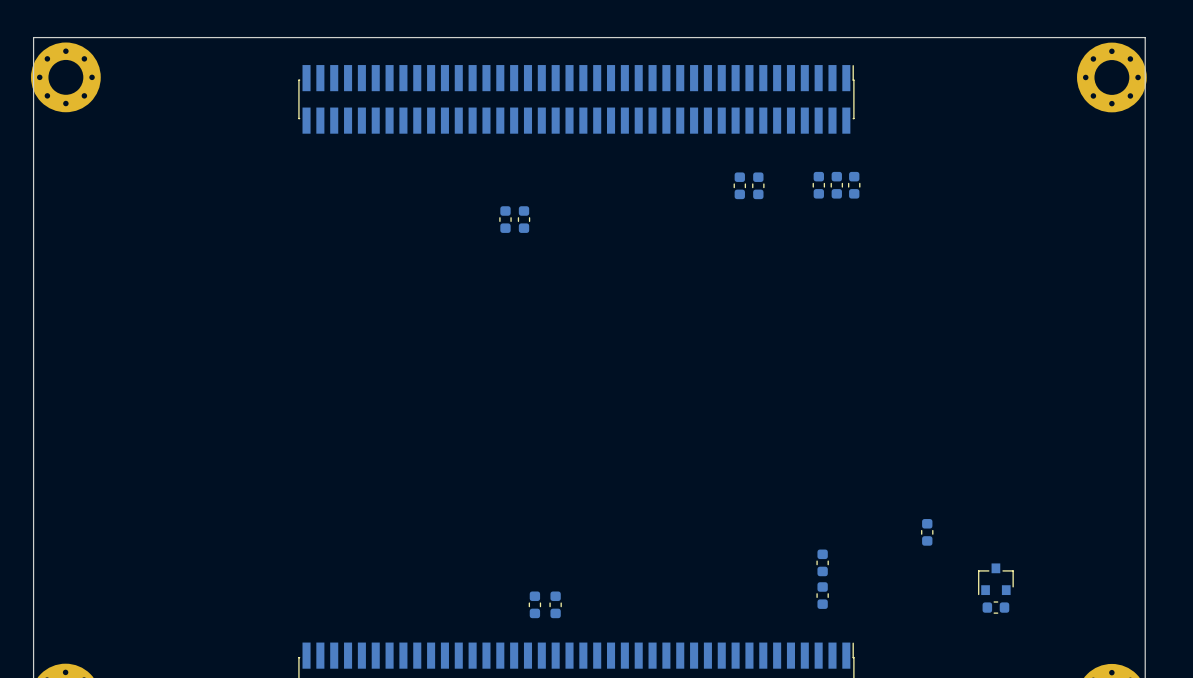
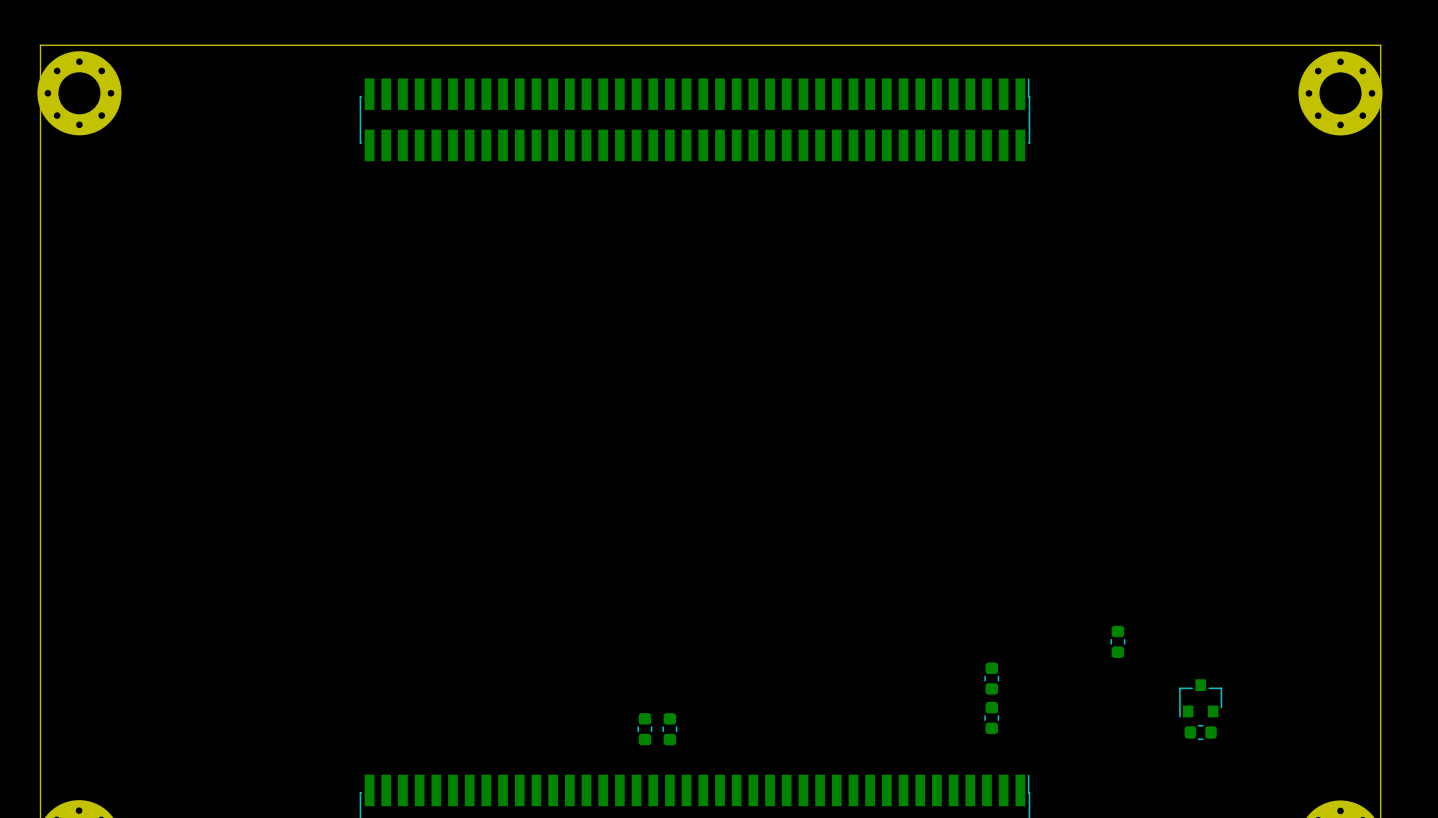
part: (739, 185) -> none
part: (758, 185) -> none
part: (818, 185) -> none
part: (836, 185) -> none
part: (854, 185) -> none
part: (505, 219) -> none
part: (524, 219) -> none

